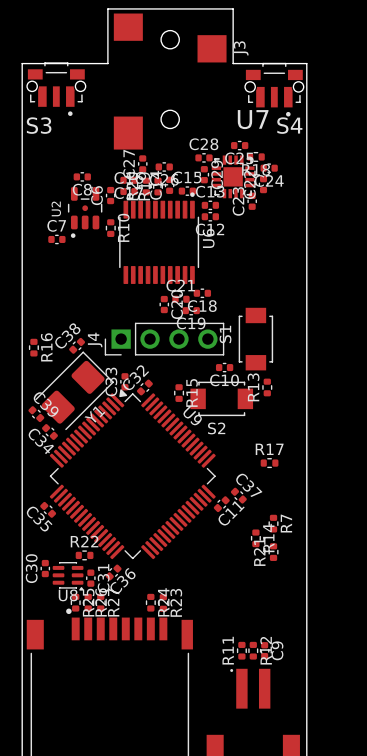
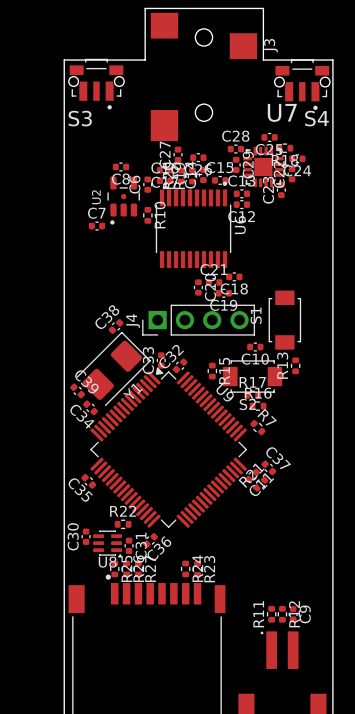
R16 rotation: 0° (33, 347) -> 90° clockwise (258, 406)
R16 position: (33, 347) -> (258, 406)
R17 position: (269, 463) -> (252, 395)
R7 rotation: 0° (273, 523) -> 45° counterclockwise (257, 427)
R7 position: (273, 523) -> (257, 427)
R14: (255, 538) -> none
R21 rotation: 0° (273, 552) -> 45° clockwise (260, 484)
R21 position: (273, 552) -> (260, 484)

